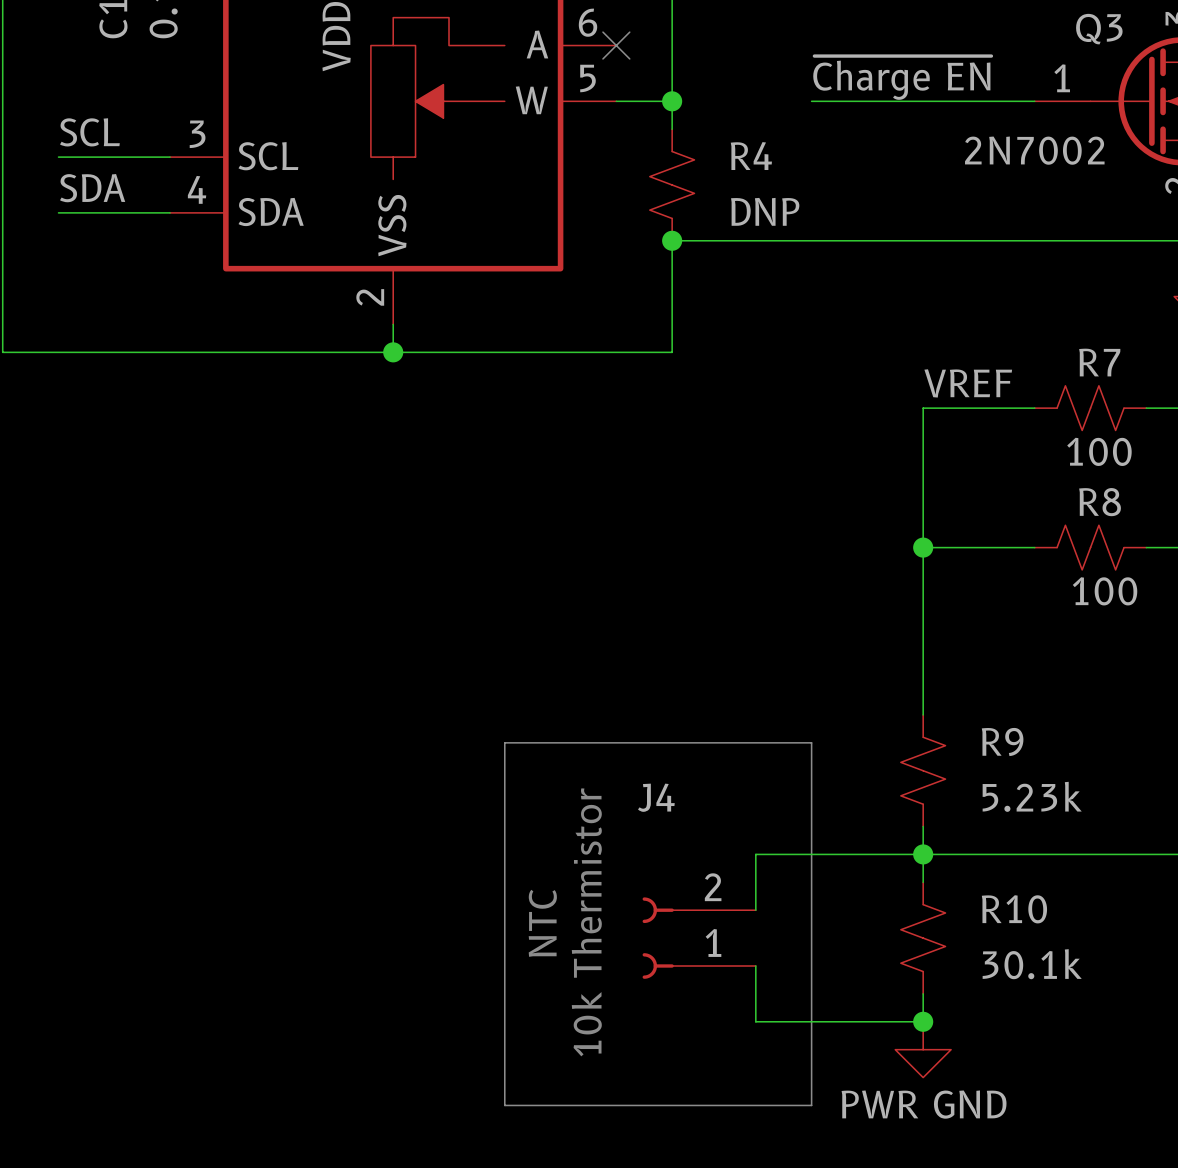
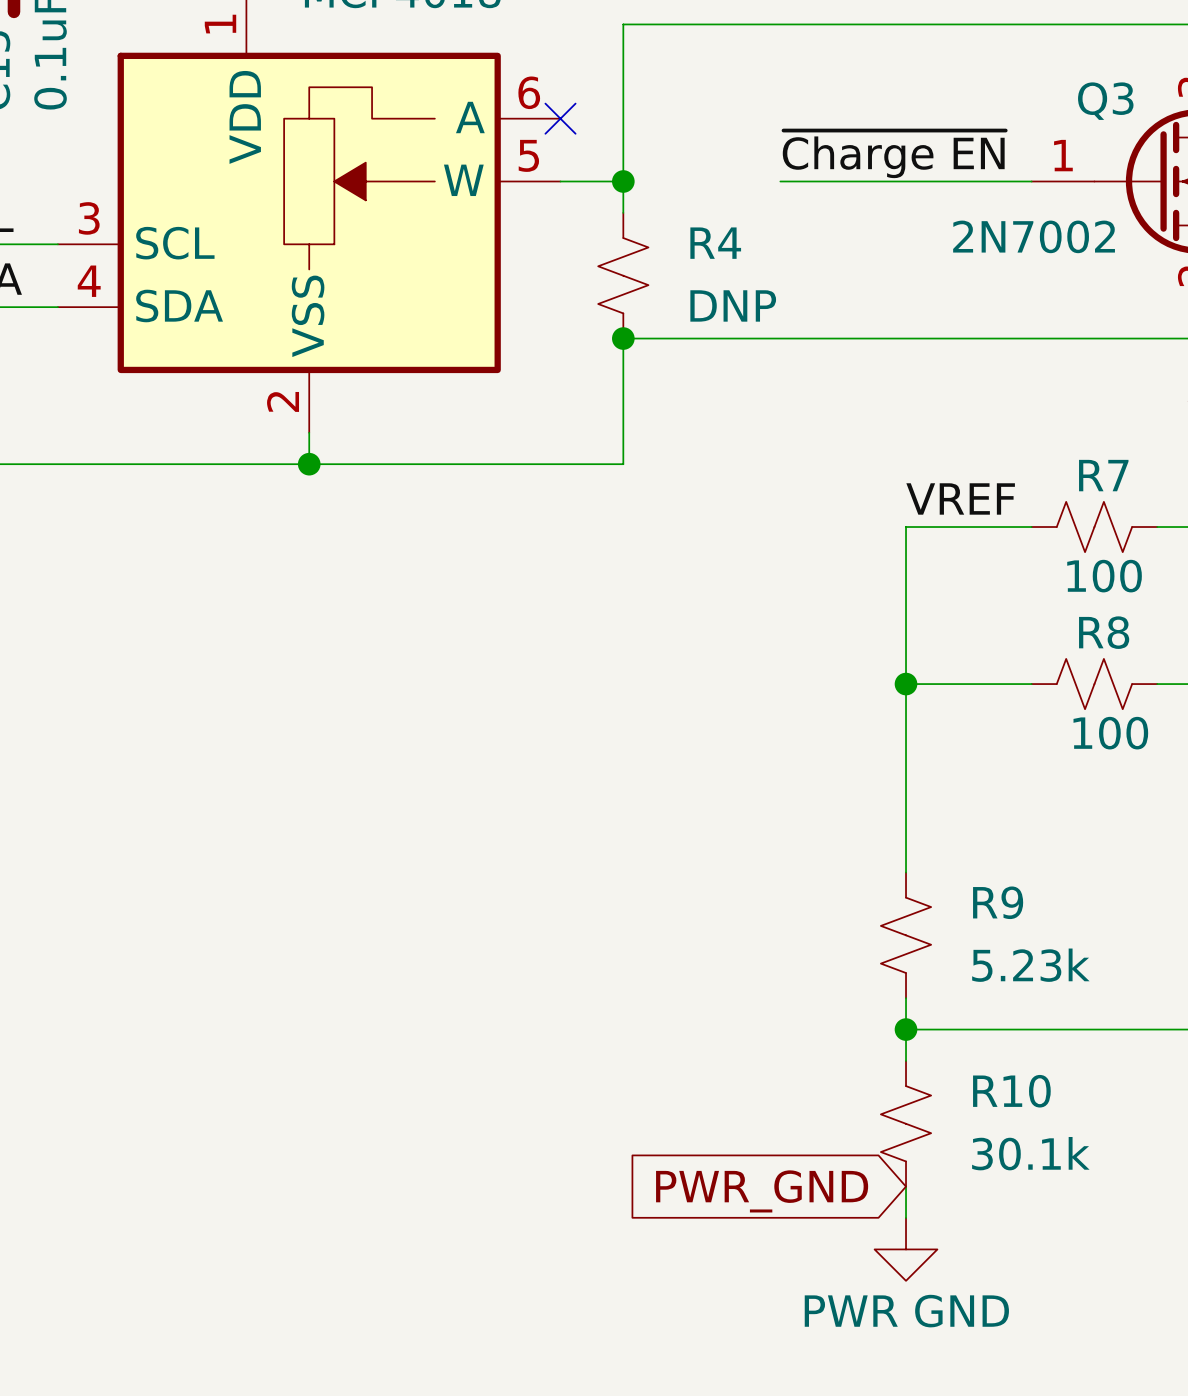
line: (504, 742) (811, 742) (811, 1105) (504, 1105) (504, 742) -> none
wire: (923, 854) (755, 854) (755, 910) -> none
text: 10k Thermistor (586, 922) -> none
text: NTC (542, 923) -> none
J4: (699, 938) -> none
wire: (755, 965) (755, 1021) (923, 1021) -> none
global label: none -> PWR_GND (762, 1191)
junction: (923, 1021) -> none

